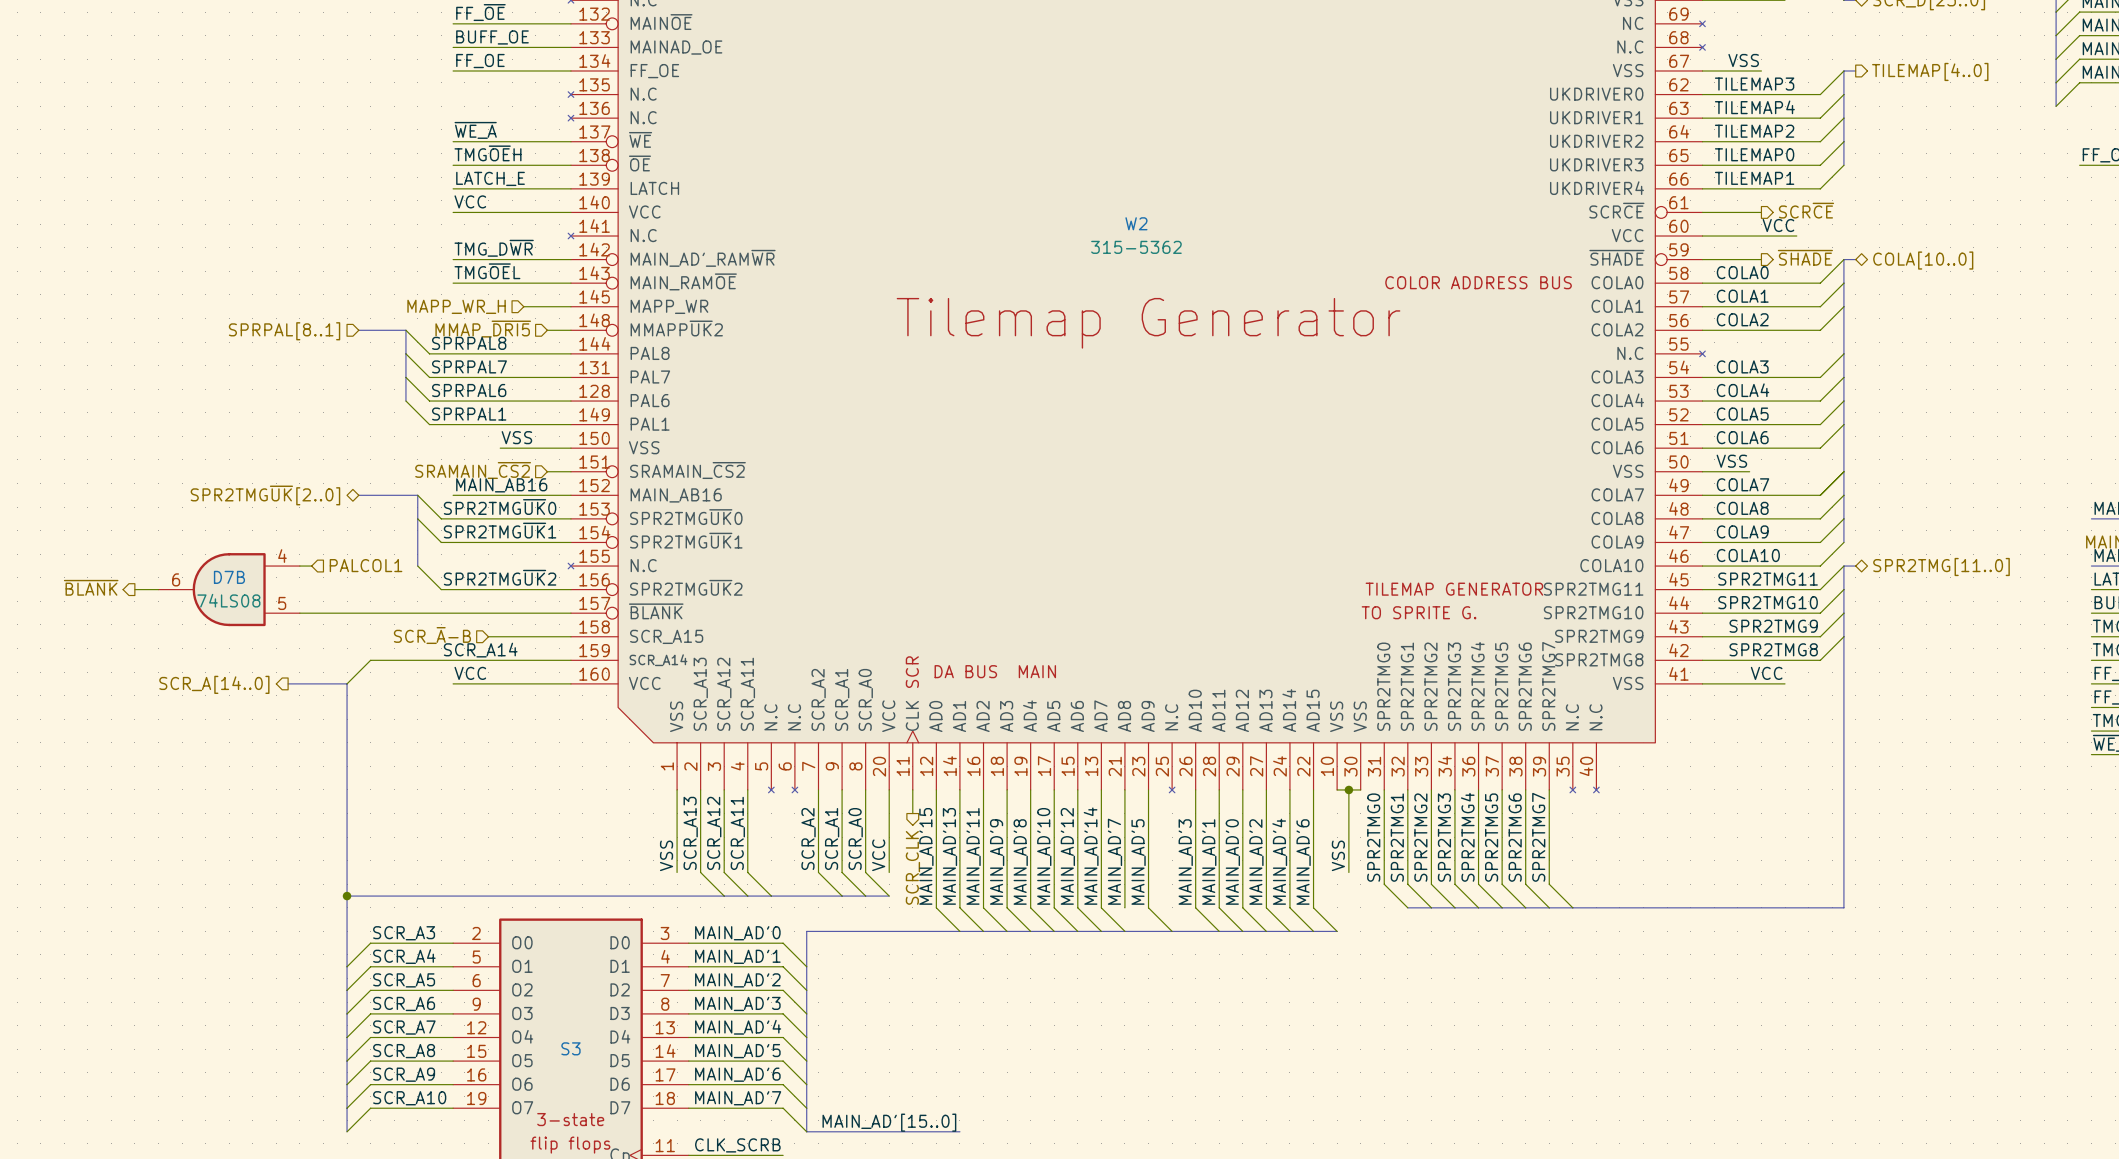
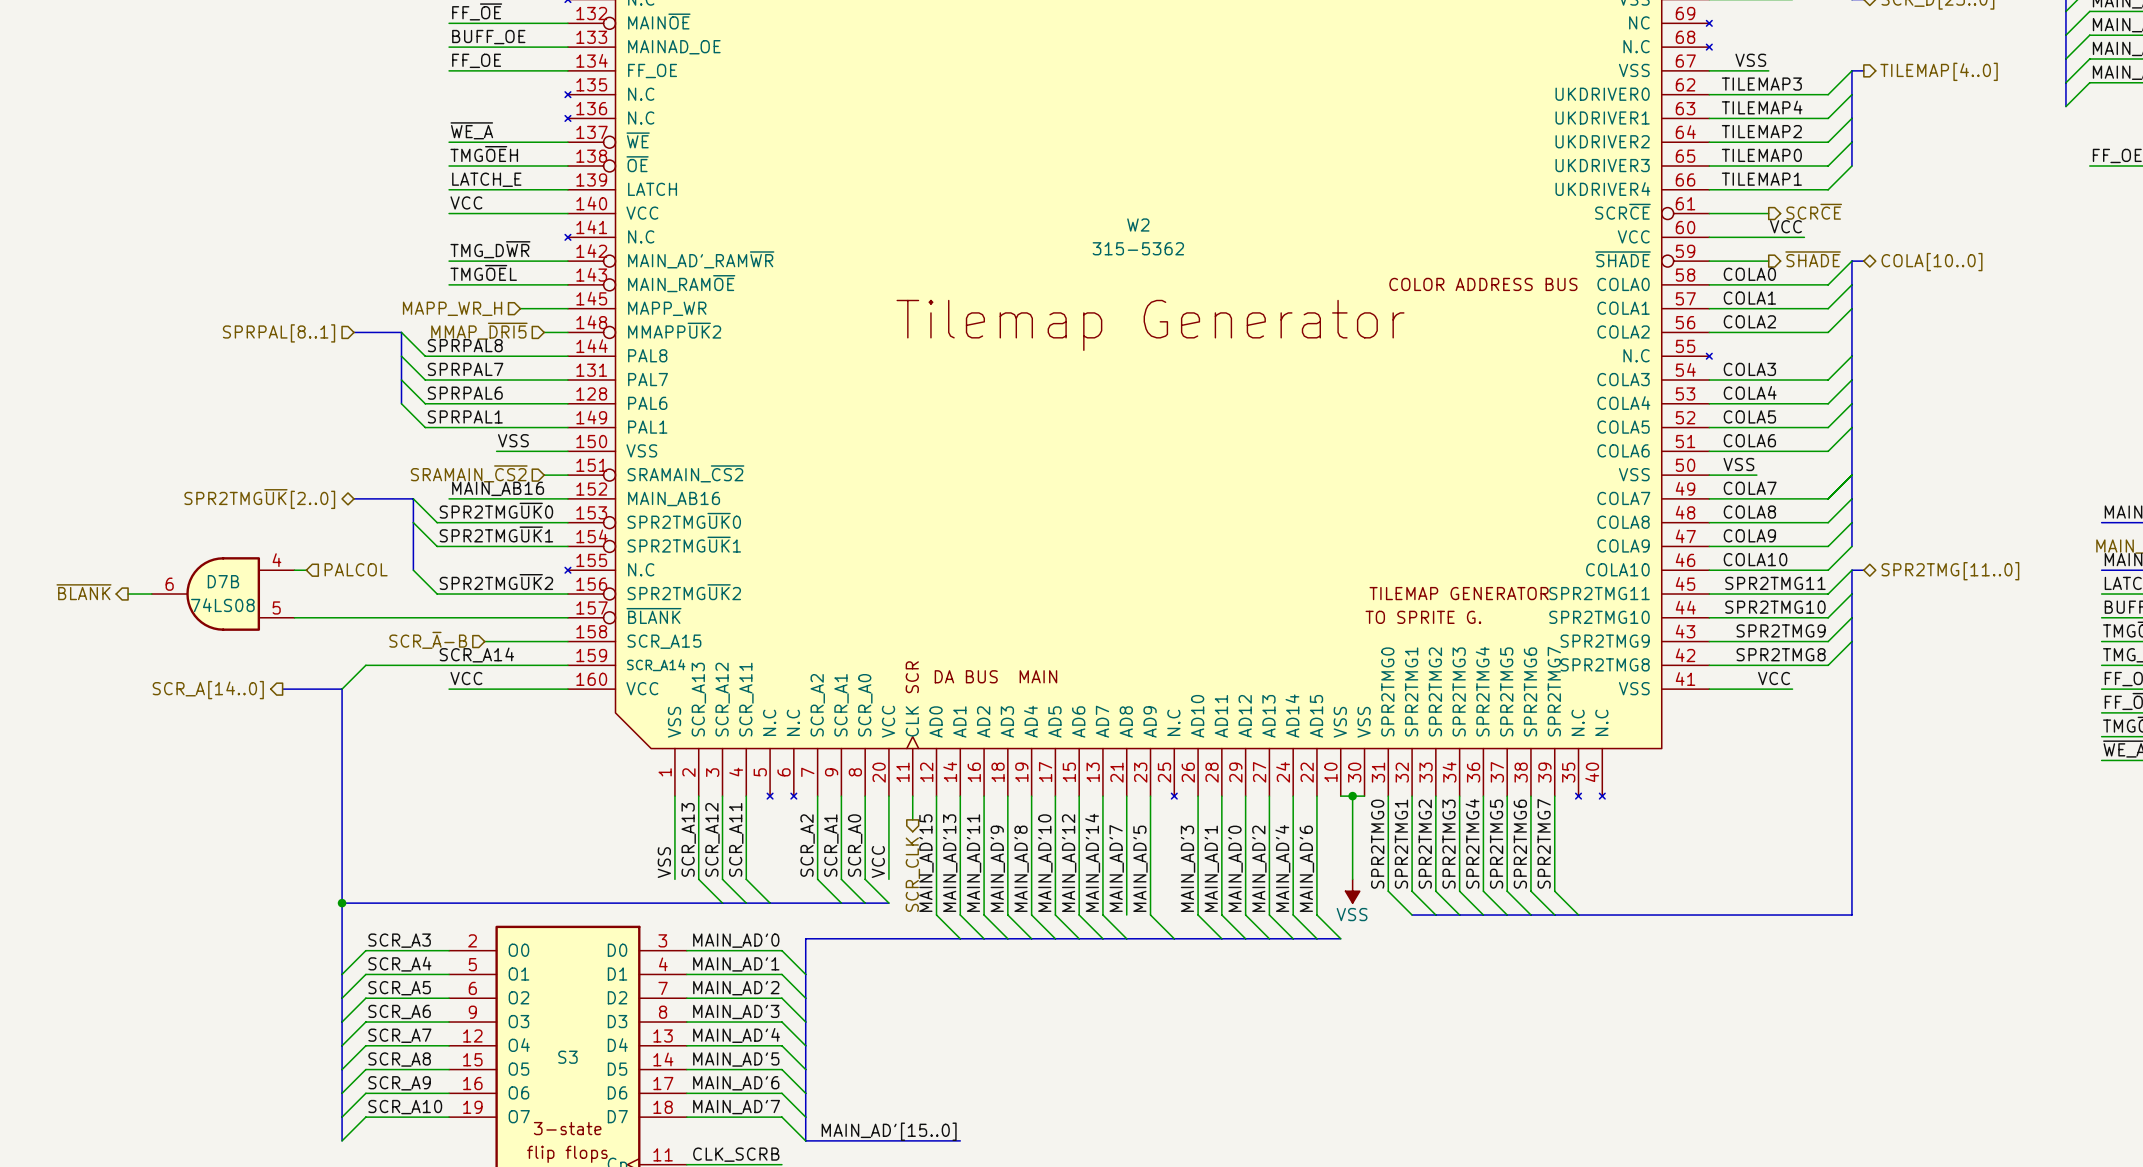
hierarchical label: PALCOL1 (366, 565) -> PALCOL (356, 569)
label: VSS (1338, 855) -> none
power symbol: none -> VSS (1352, 891)

